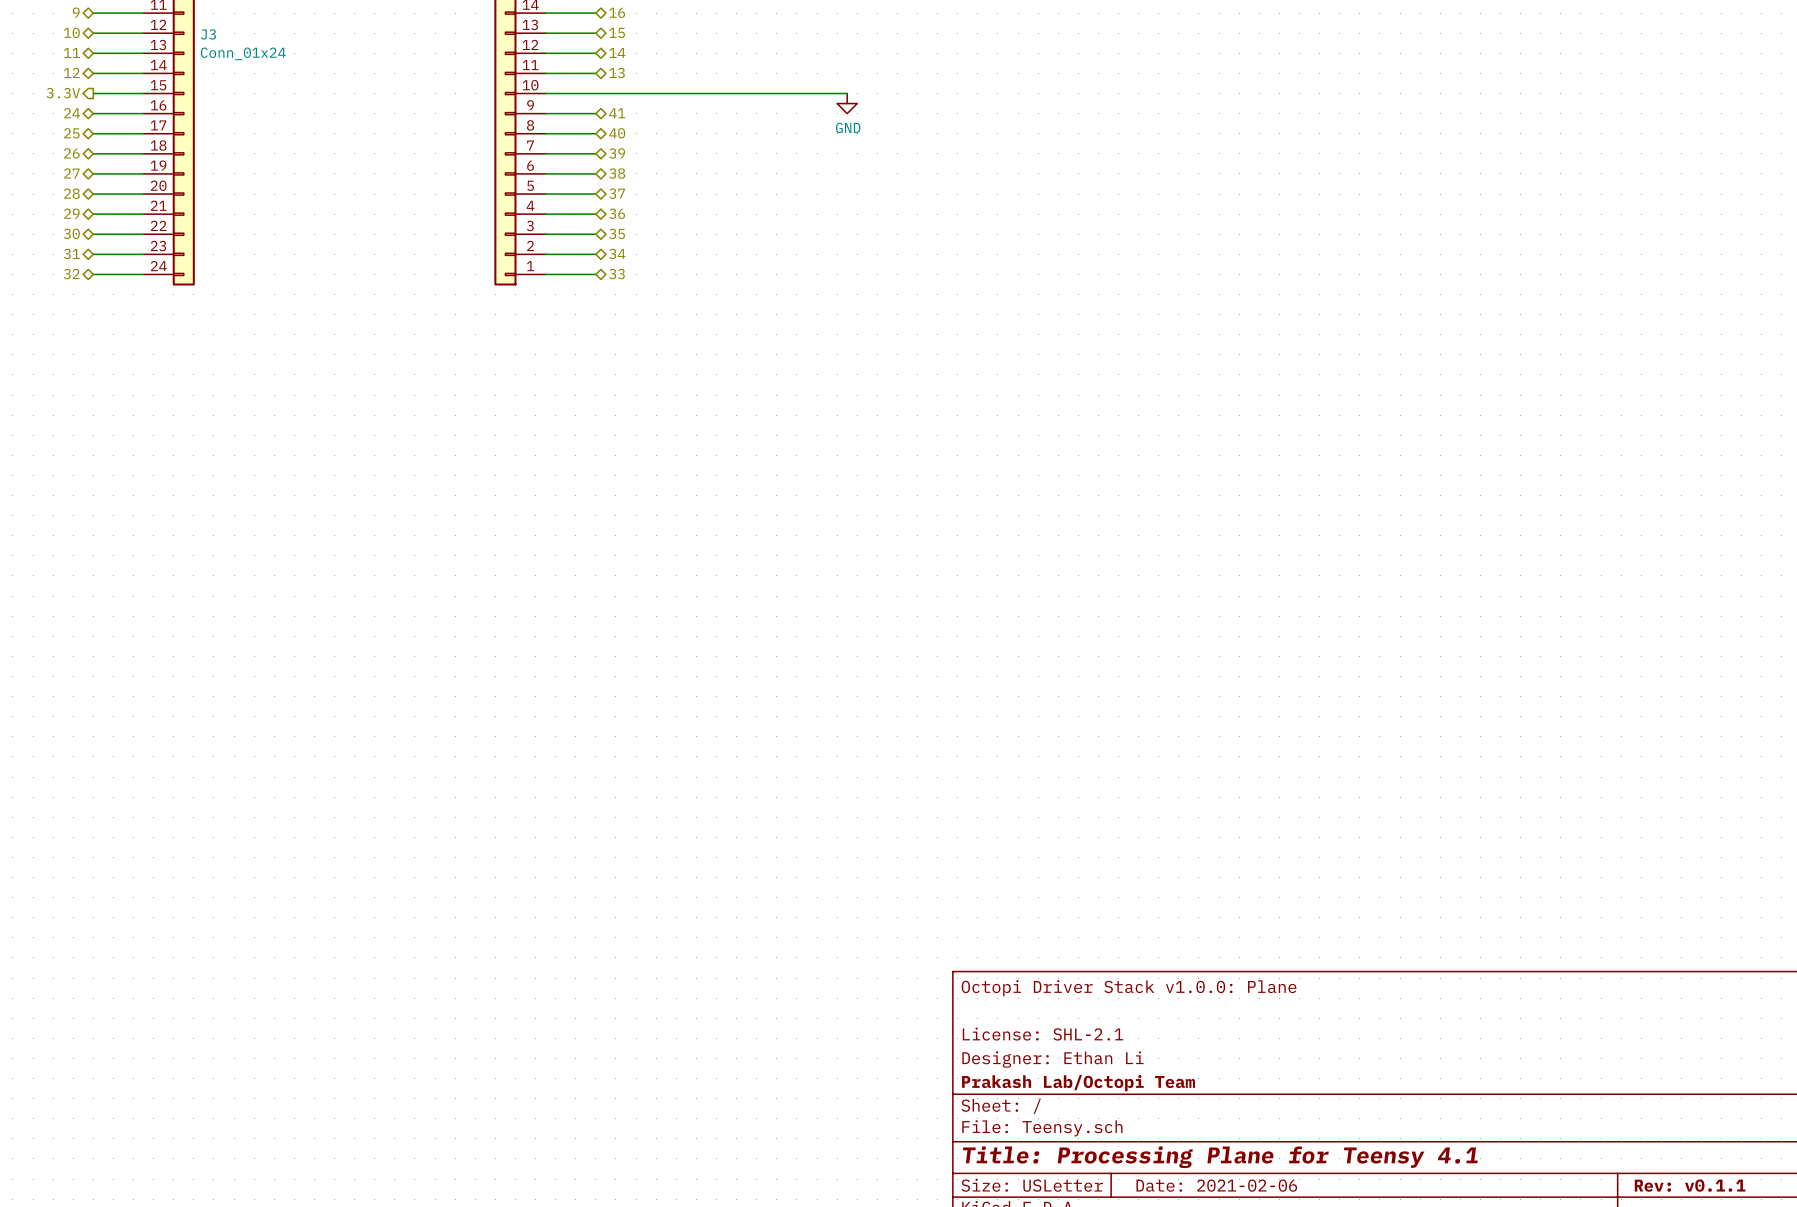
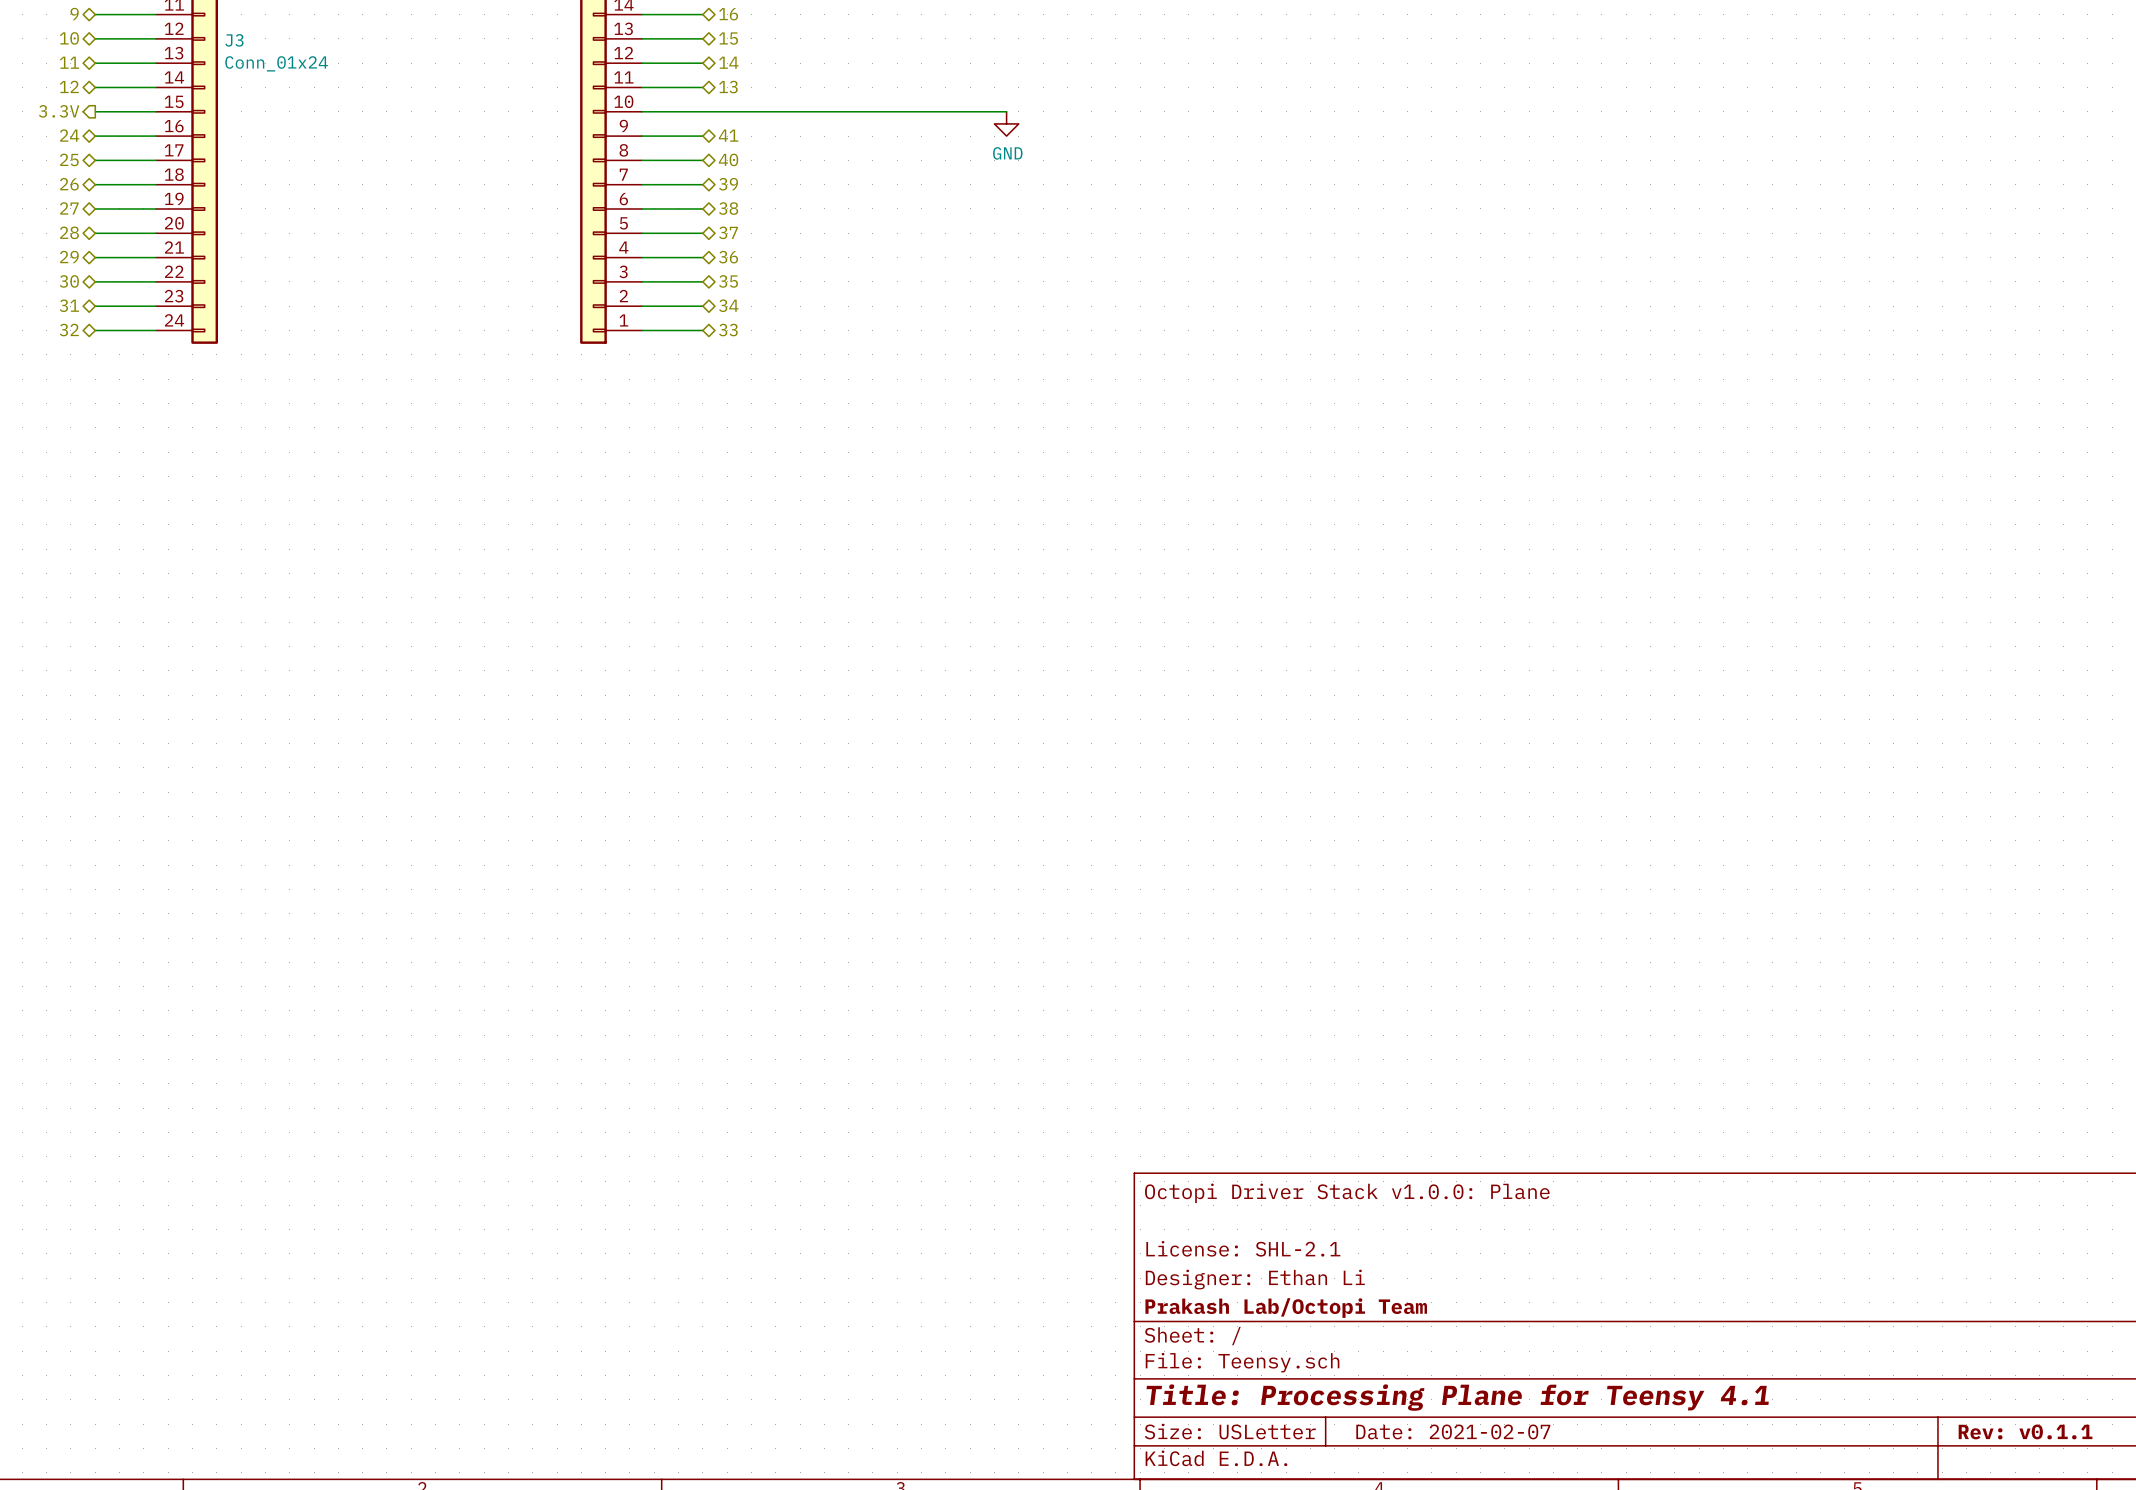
title block: Date: 2021-02-06 (1216, 1185) -> Date: 2021-02-07 (1453, 1431)

